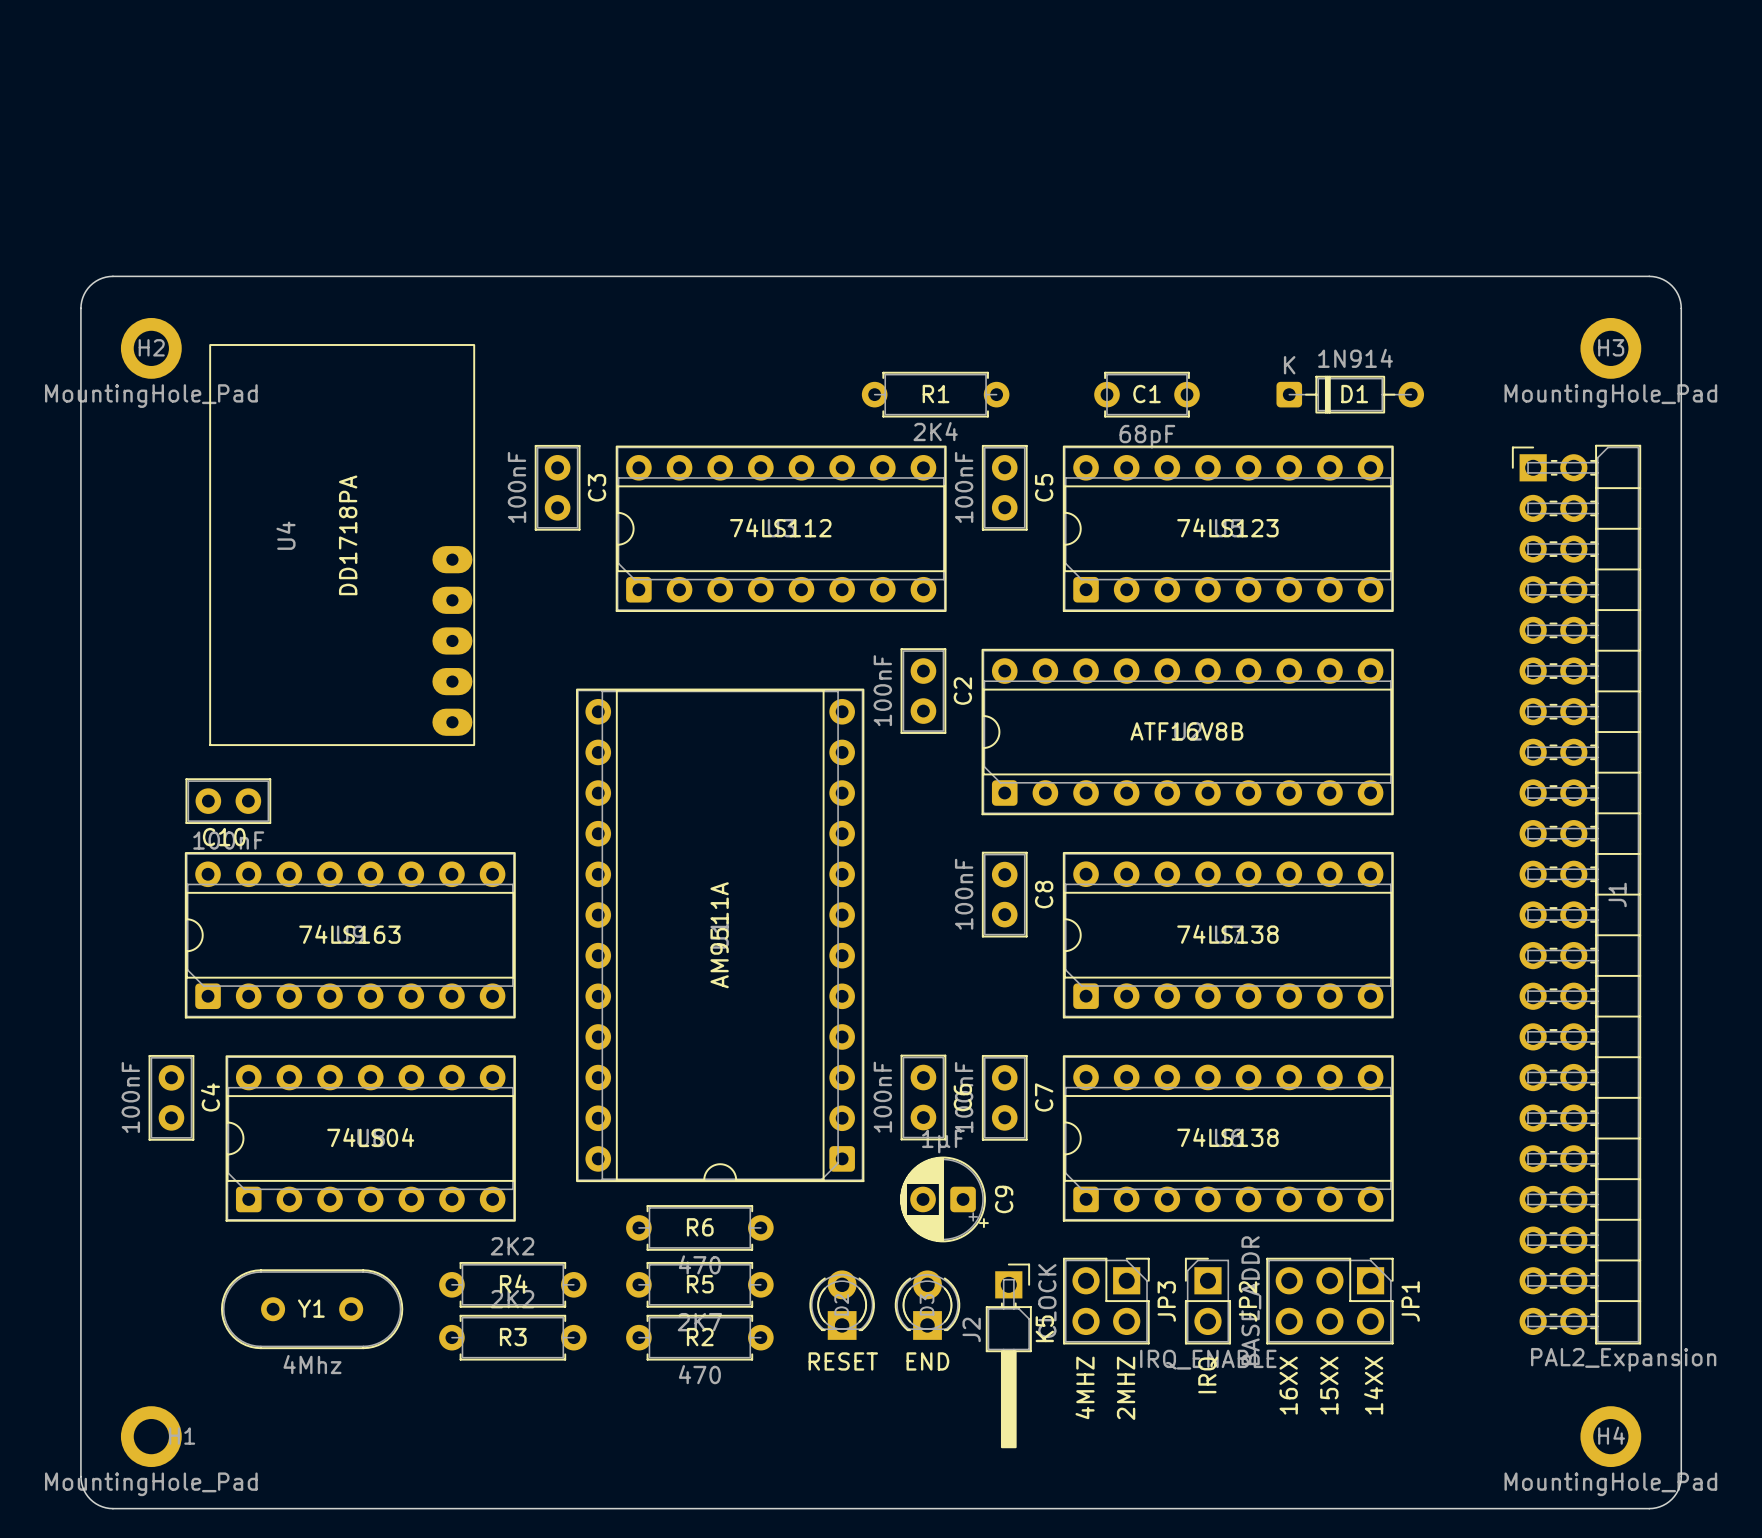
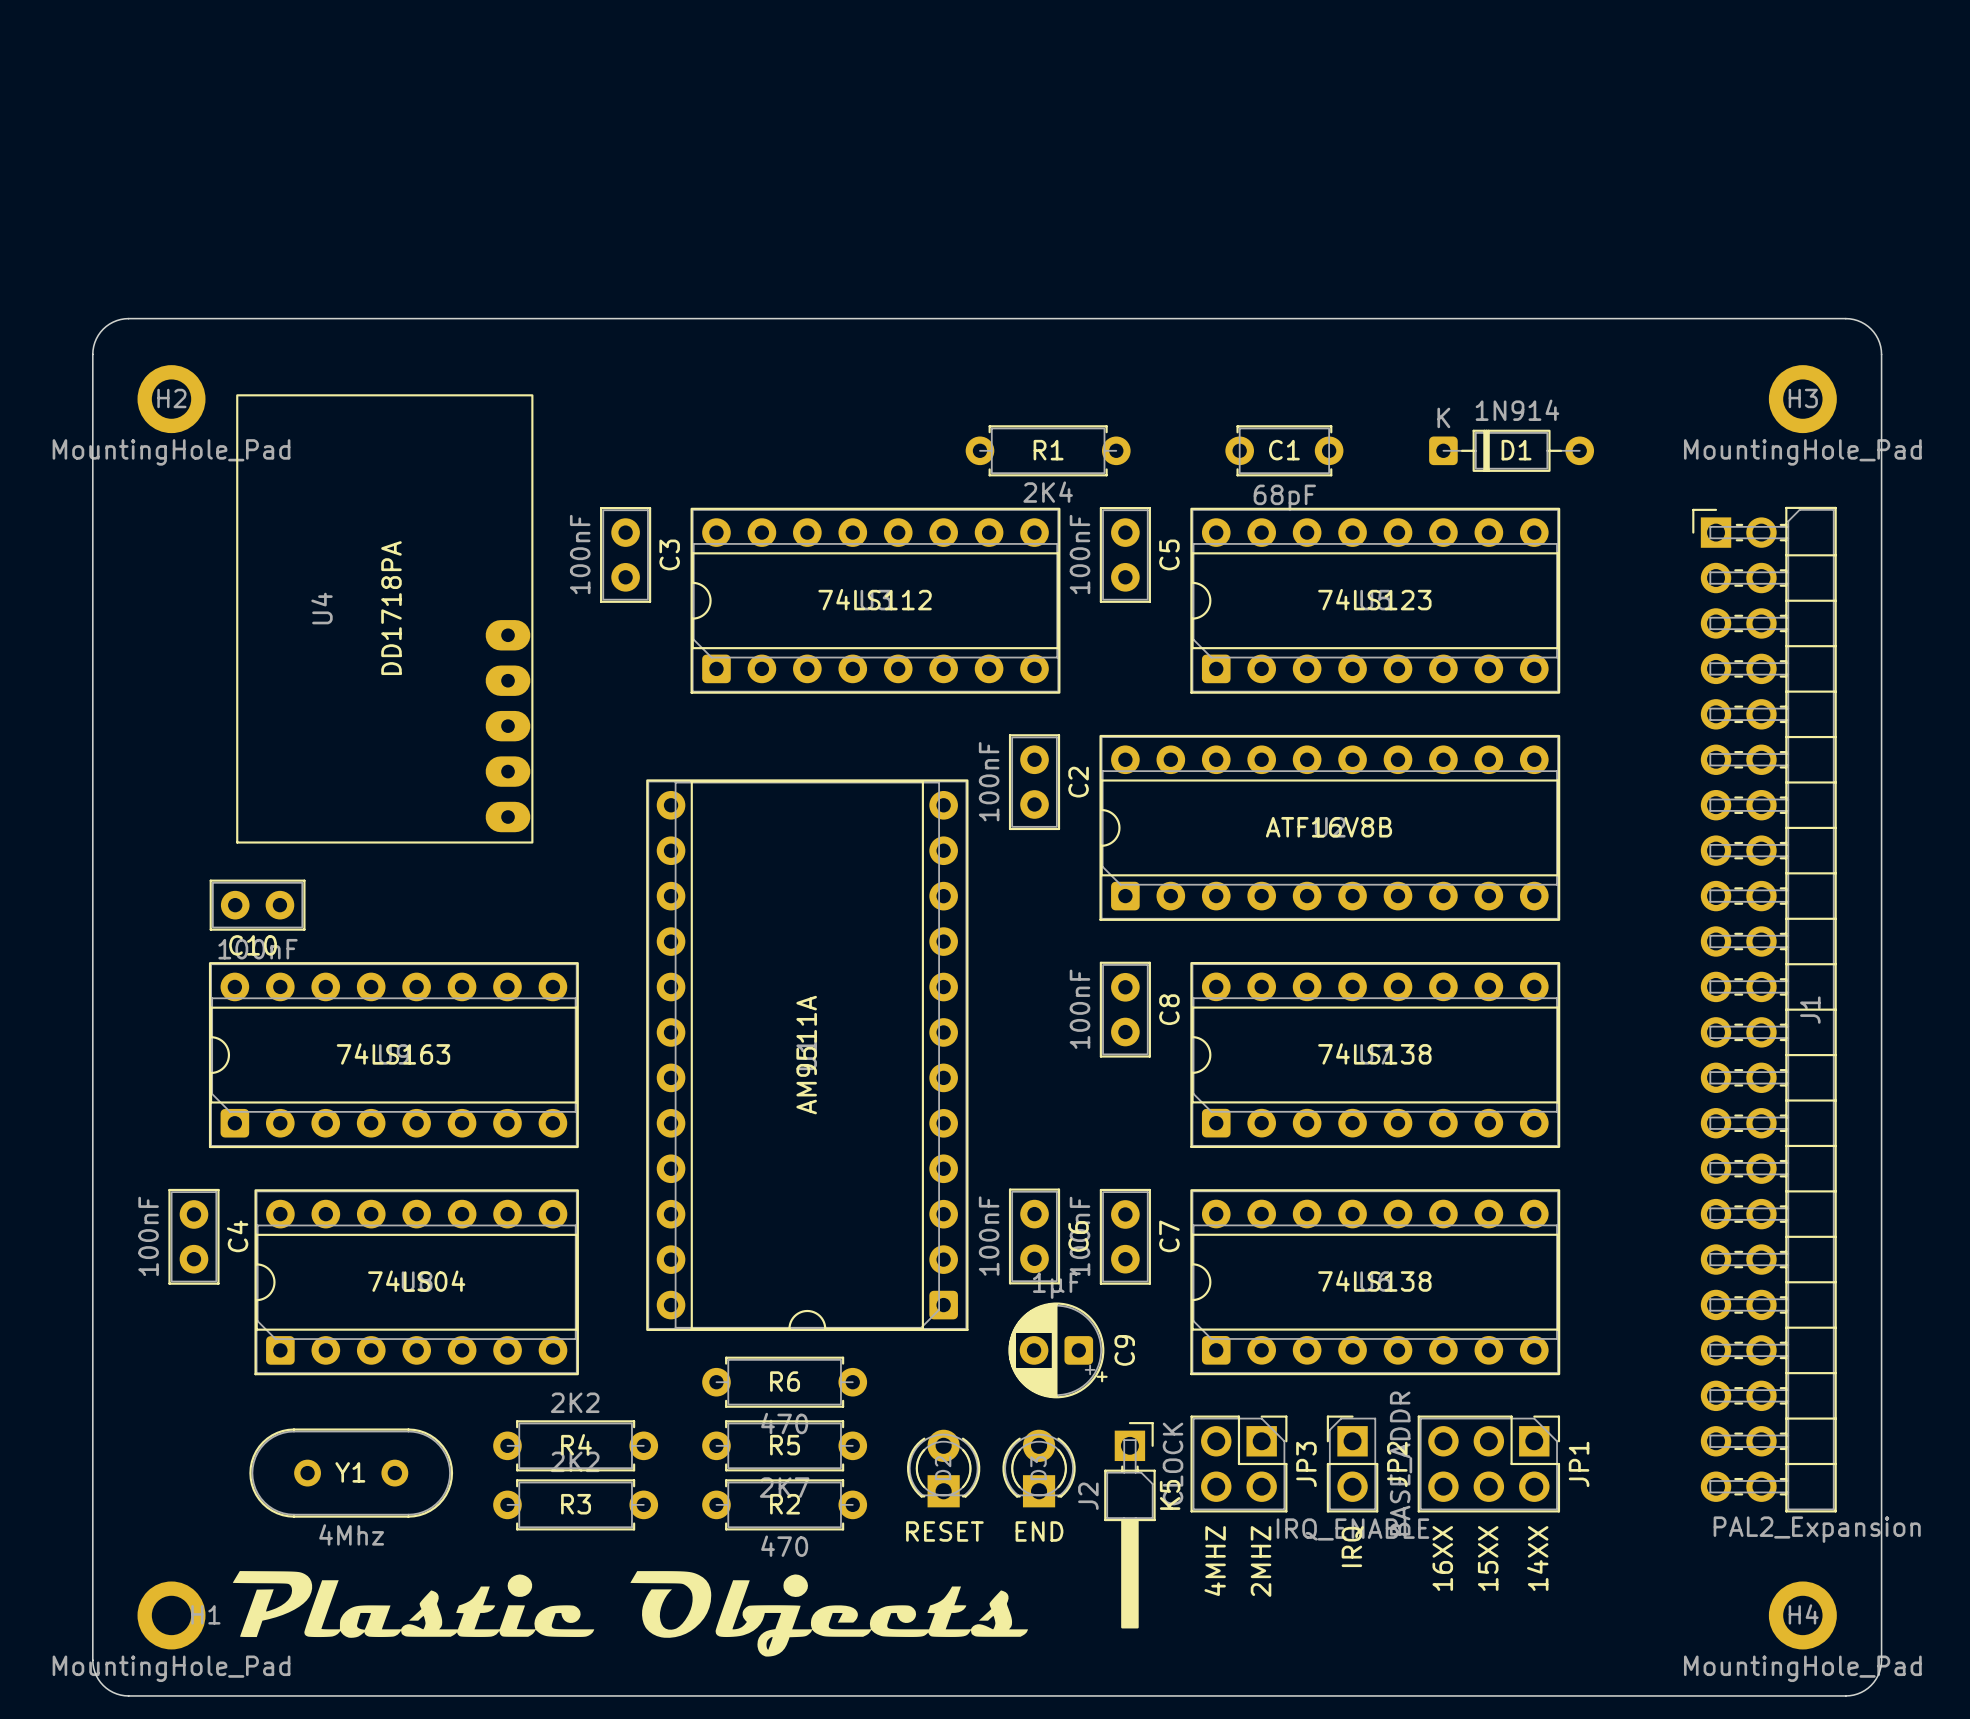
drawing: none -> [232, 1571, 1029, 1657]

